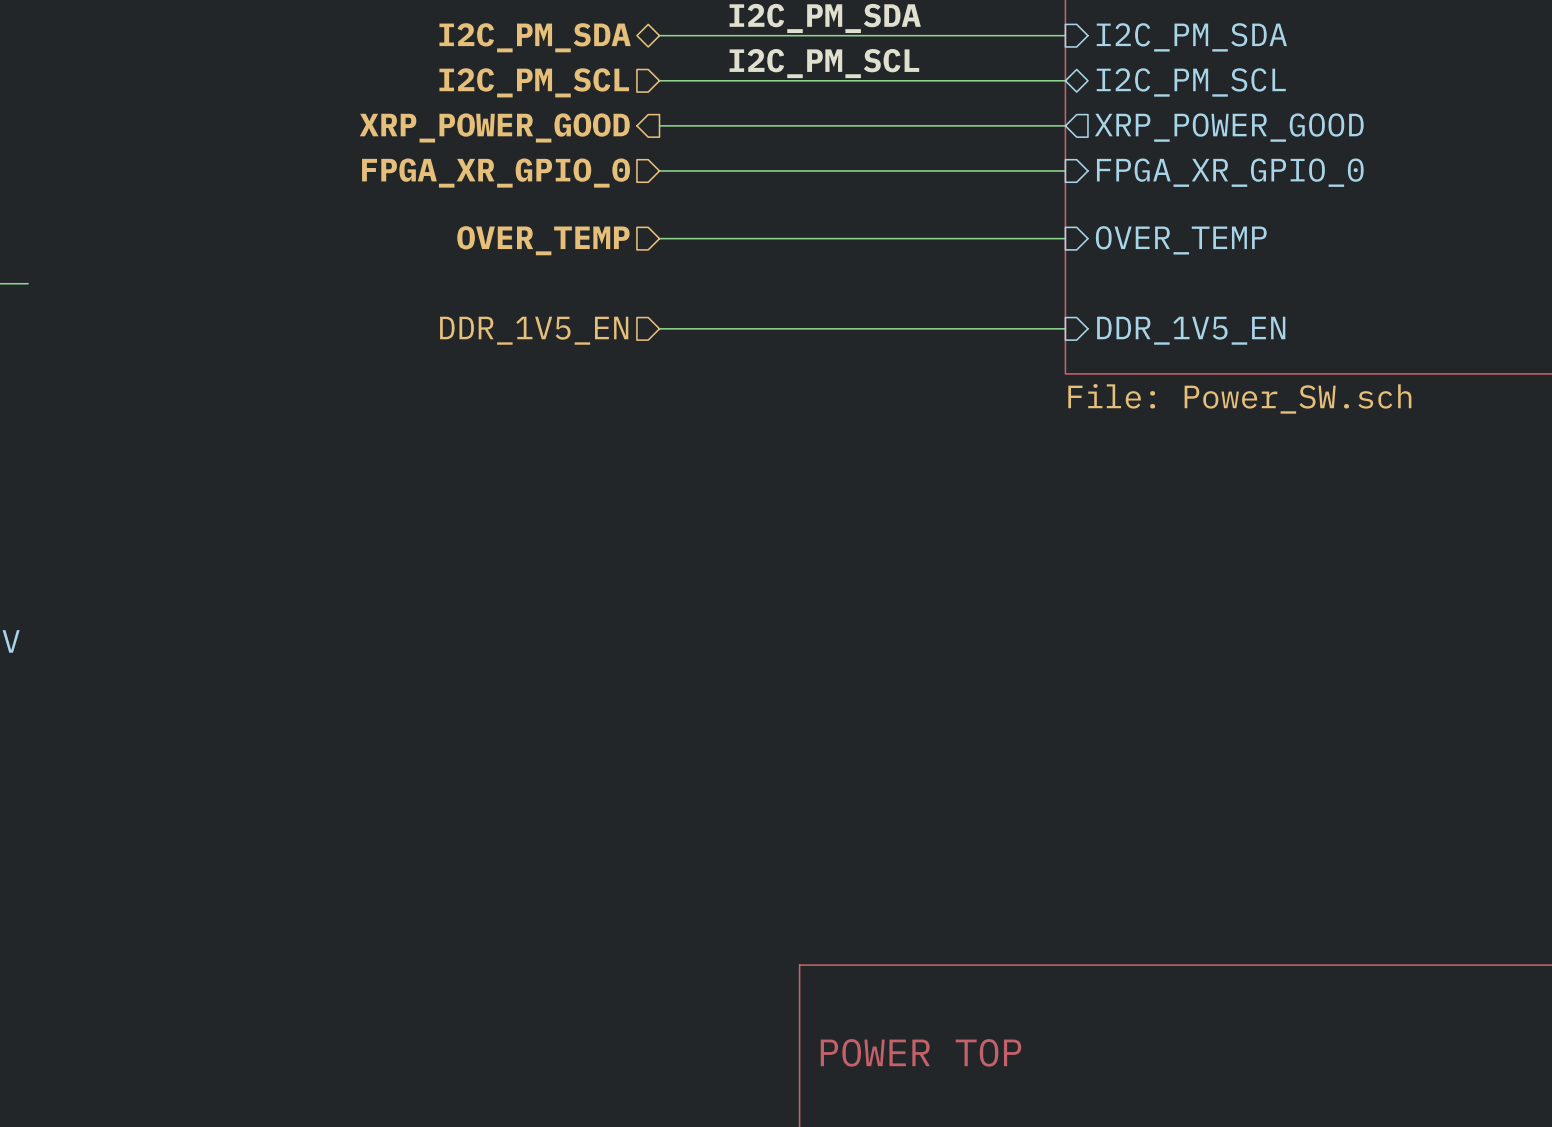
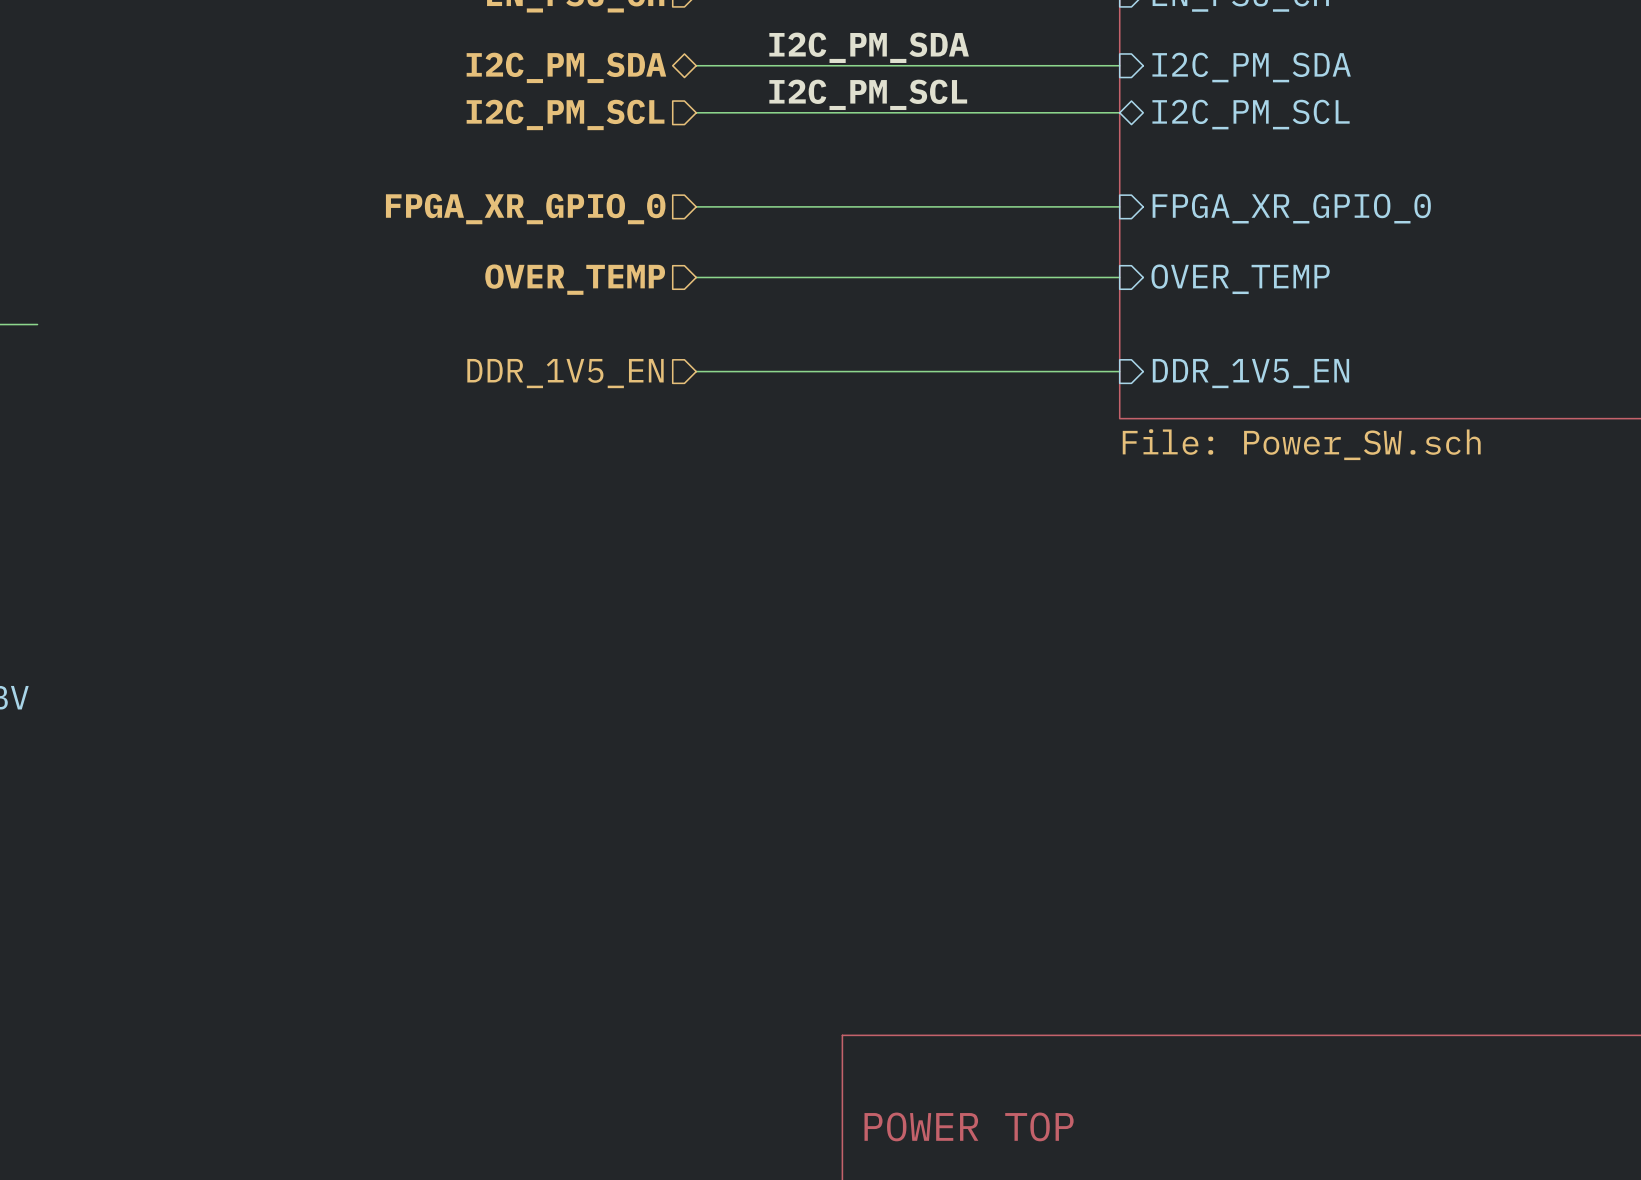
wire: (659, 125) (1065, 125) -> none
hierarchical label: XRP_POWER_GOOD (494, 127) -> none
sheet pin: XRP_POWER_GOOD (1229, 127) -> none

